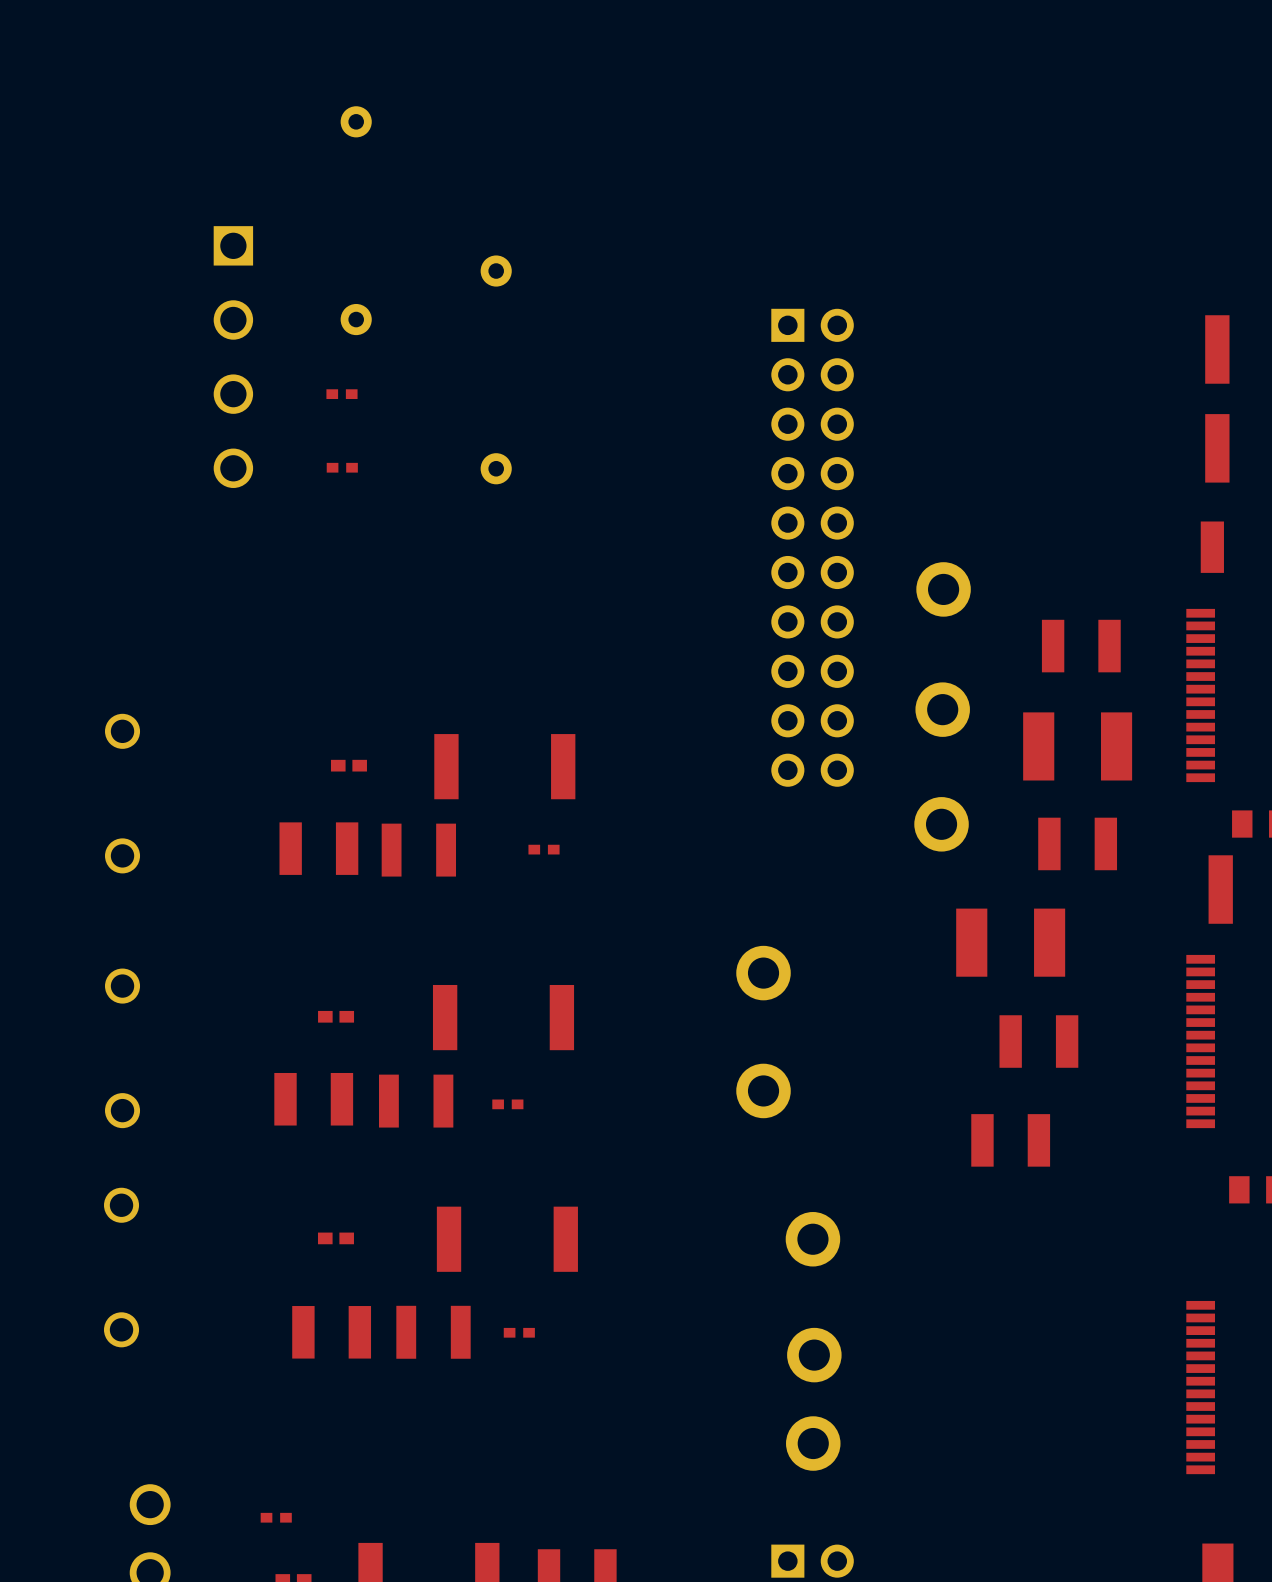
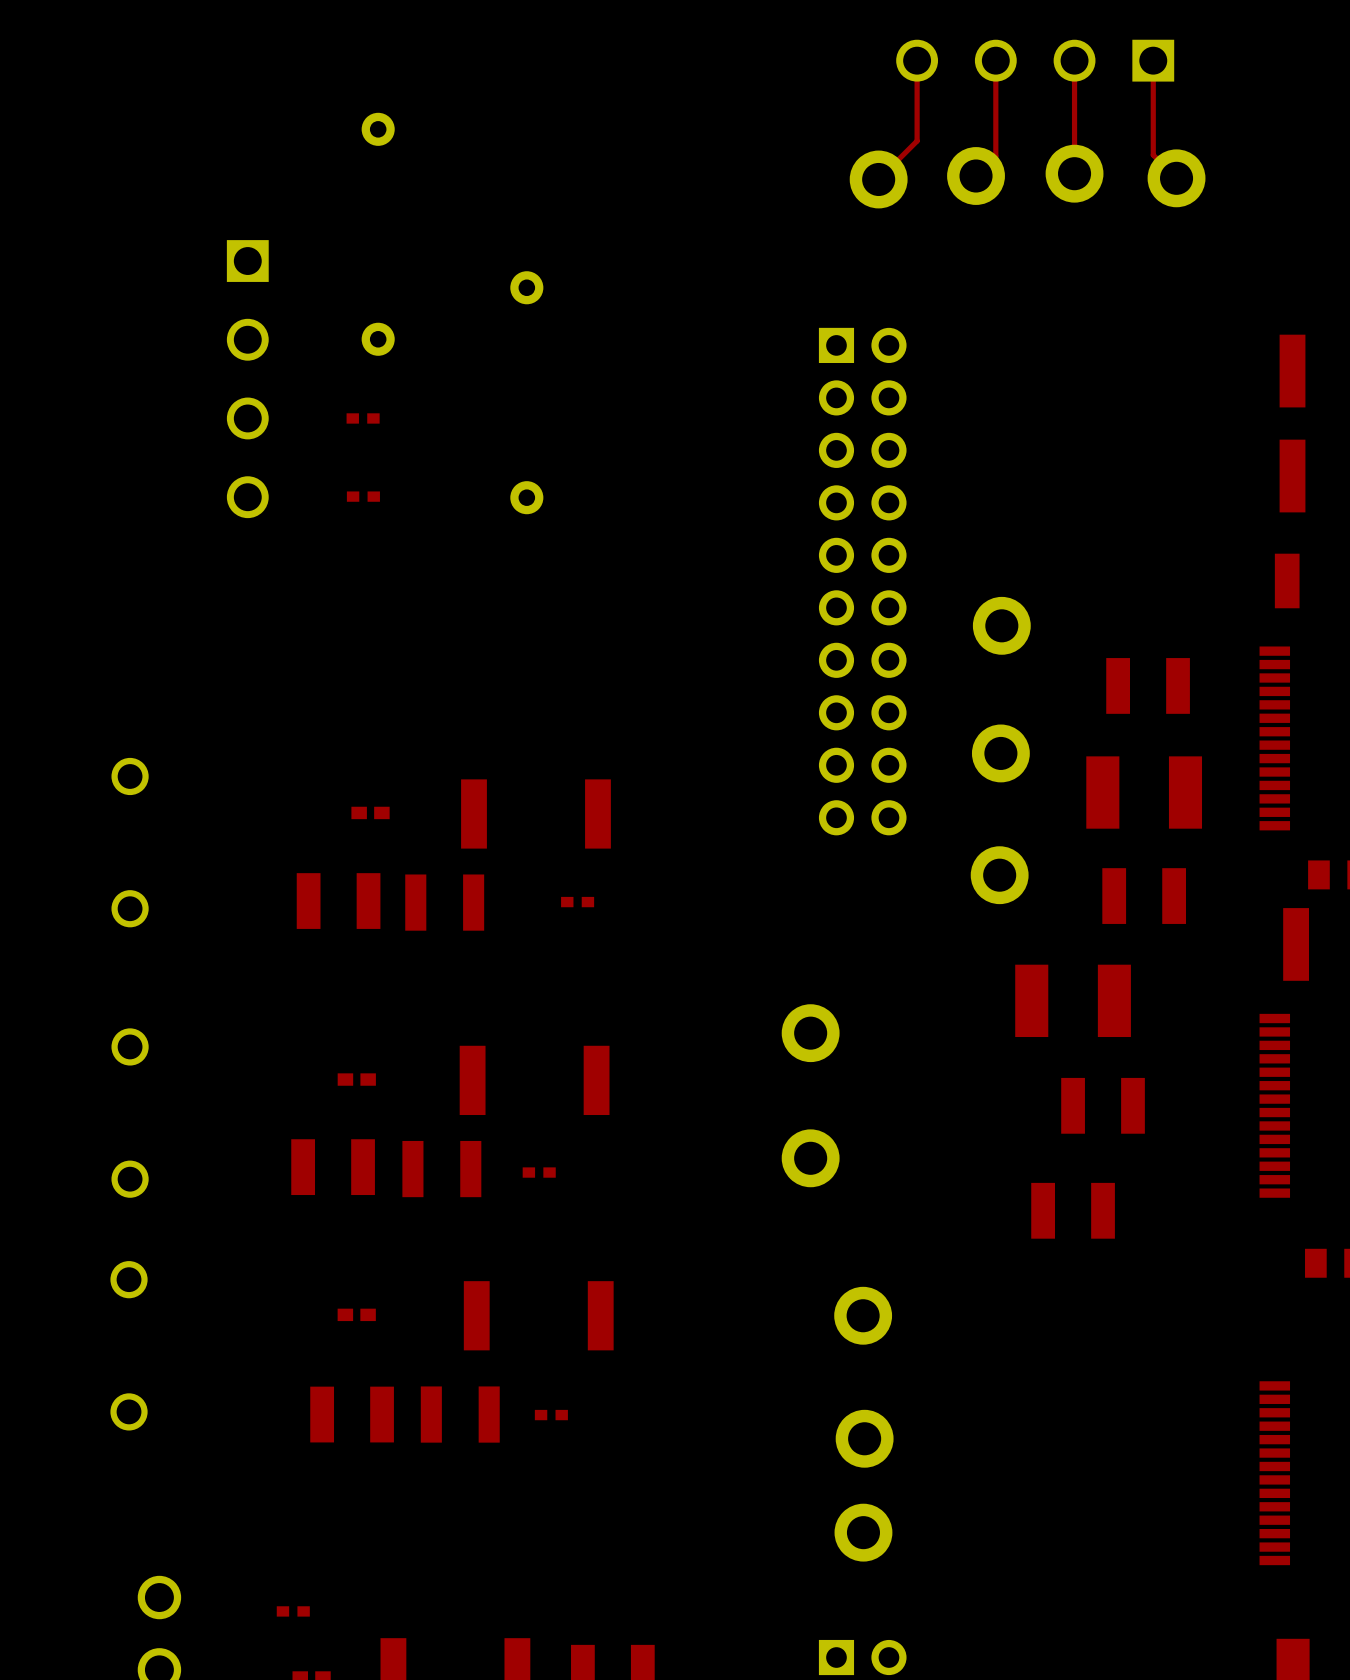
top track: none -> (917, 60) (917, 141) (878, 179)
top track: none -> (995, 60) (995, 156) (976, 176)
part: none -> (1035, 60)
top track: none -> (1074, 60) (1074, 173)
top track: none -> (1153, 60) (1153, 155) (1176, 178)
part: none -> (1074, 173)
part: none -> (976, 176)
part: none -> (1176, 178)
part: none -> (878, 179)

